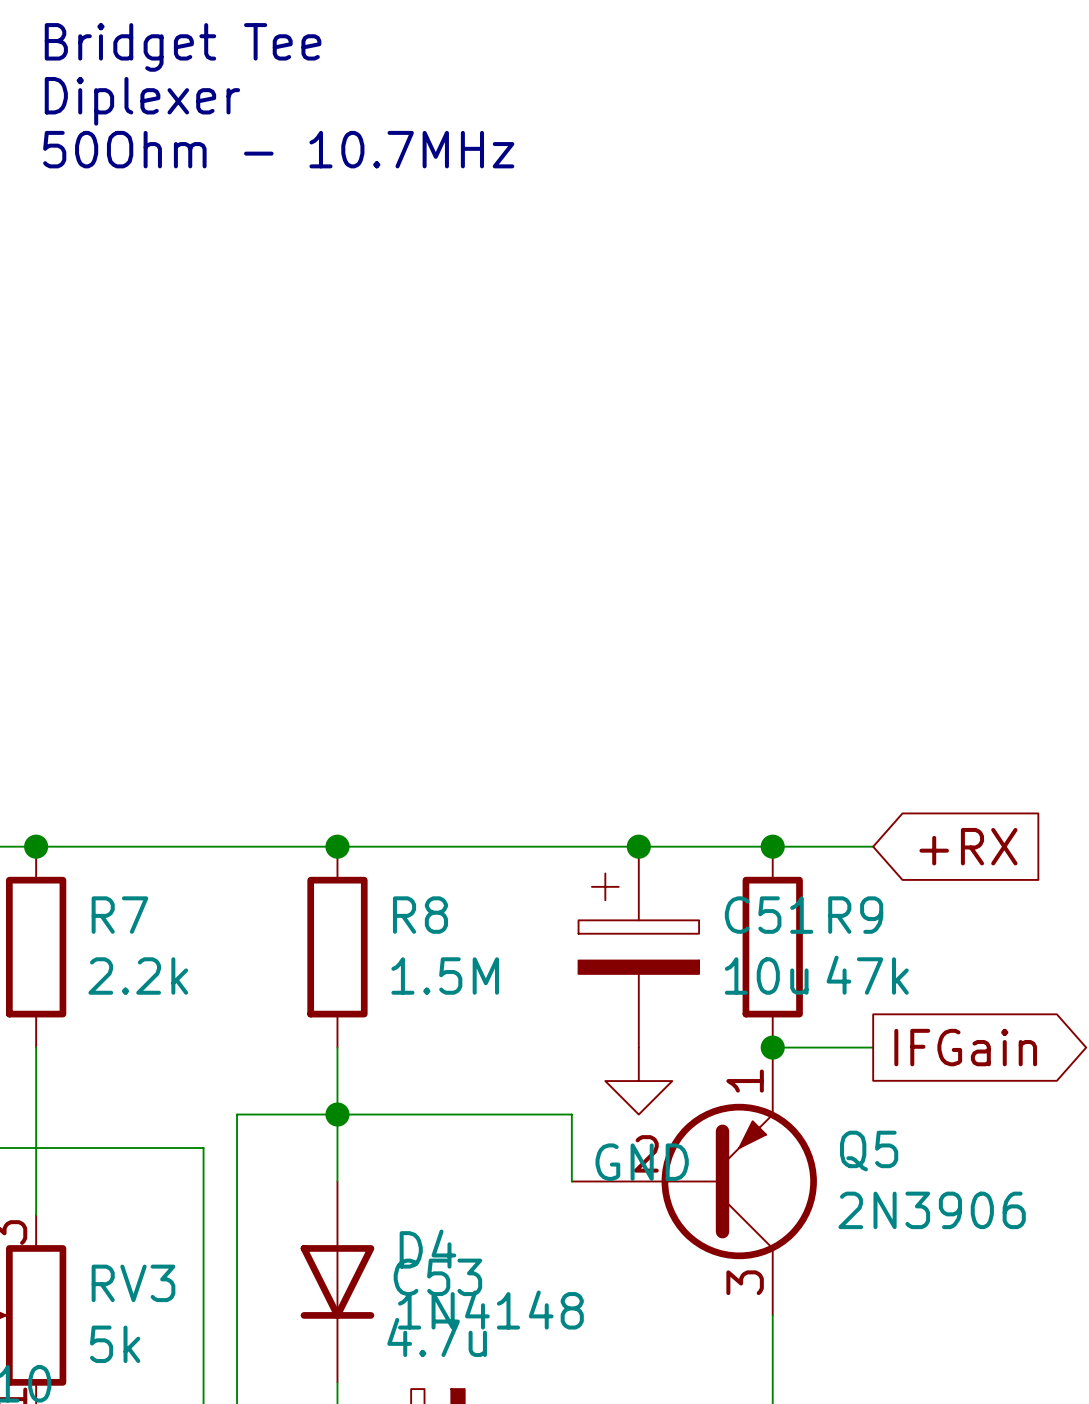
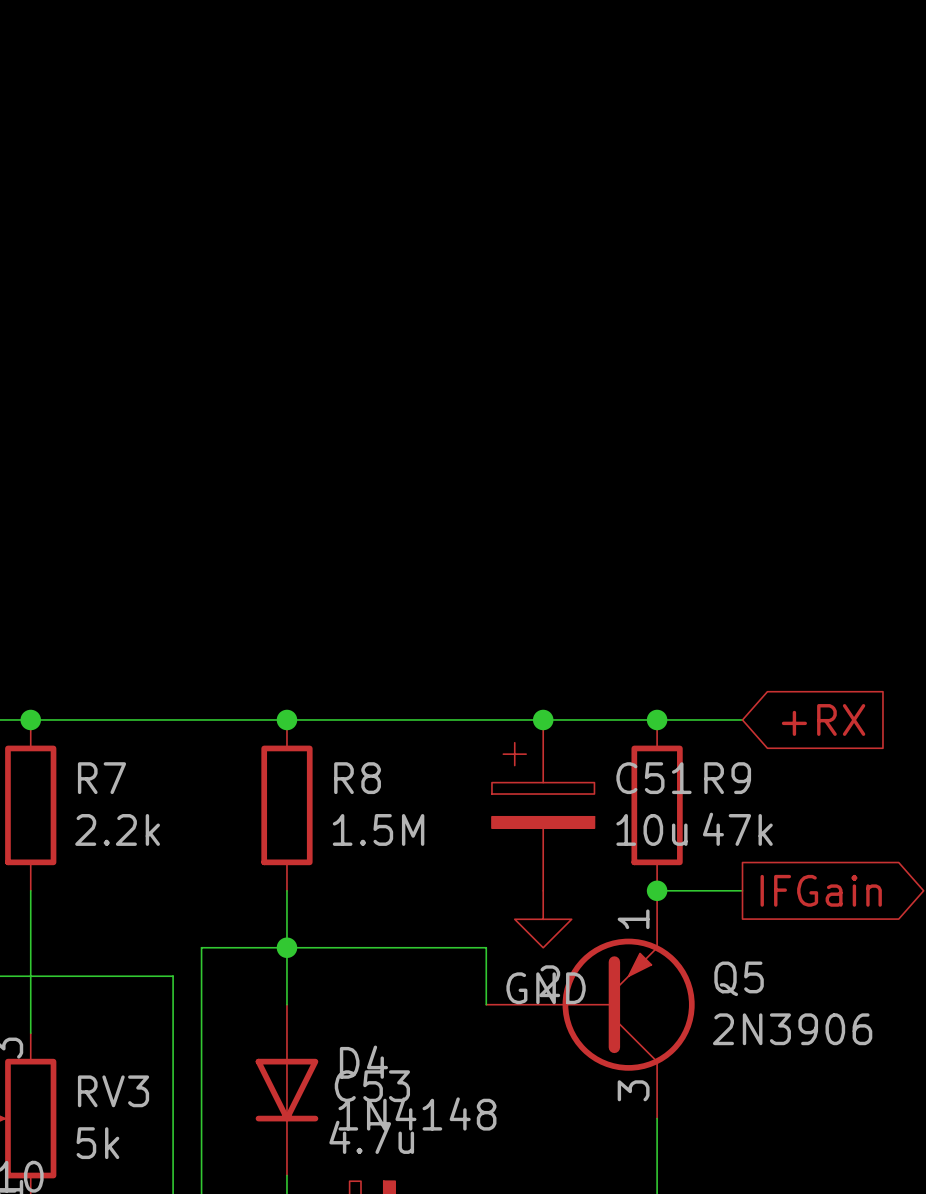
text: Bridget Tee (183, 47) -> none
text: Diplexer (142, 101) -> none
text: 50Ohm - 10.7MHz (278, 149) -> none

